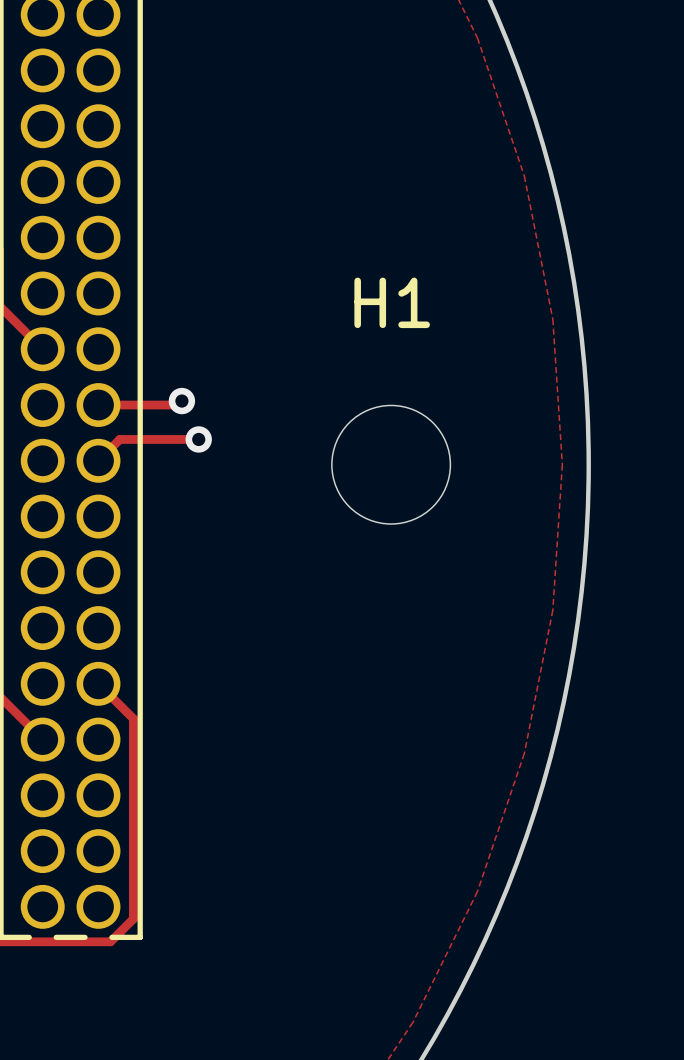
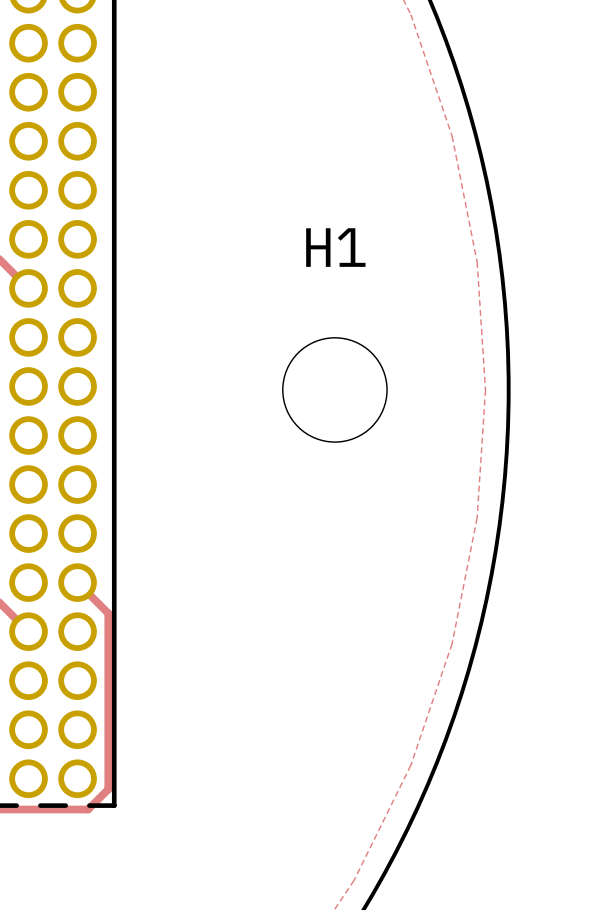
track: (181, 401) (177, 405) (98, 405) -> none
via: (181, 401) -> none
track: (198, 439) (119, 439) (98, 460) -> none
via: (198, 439) -> none

